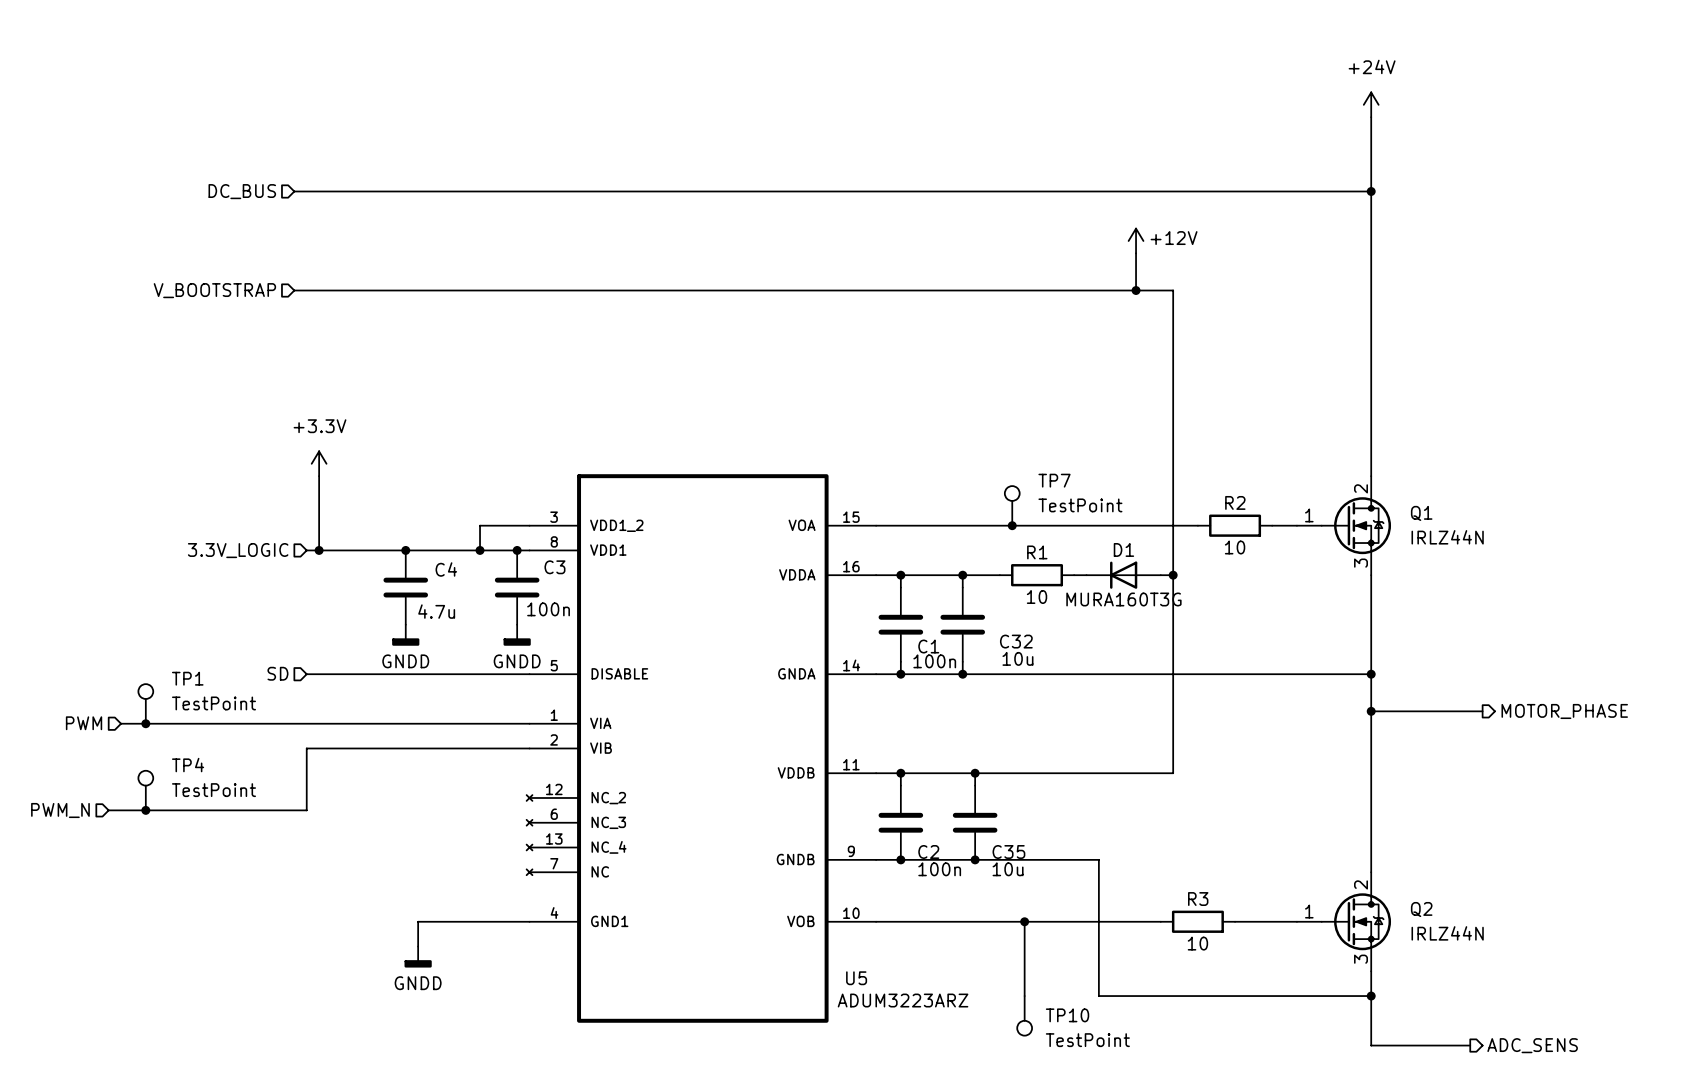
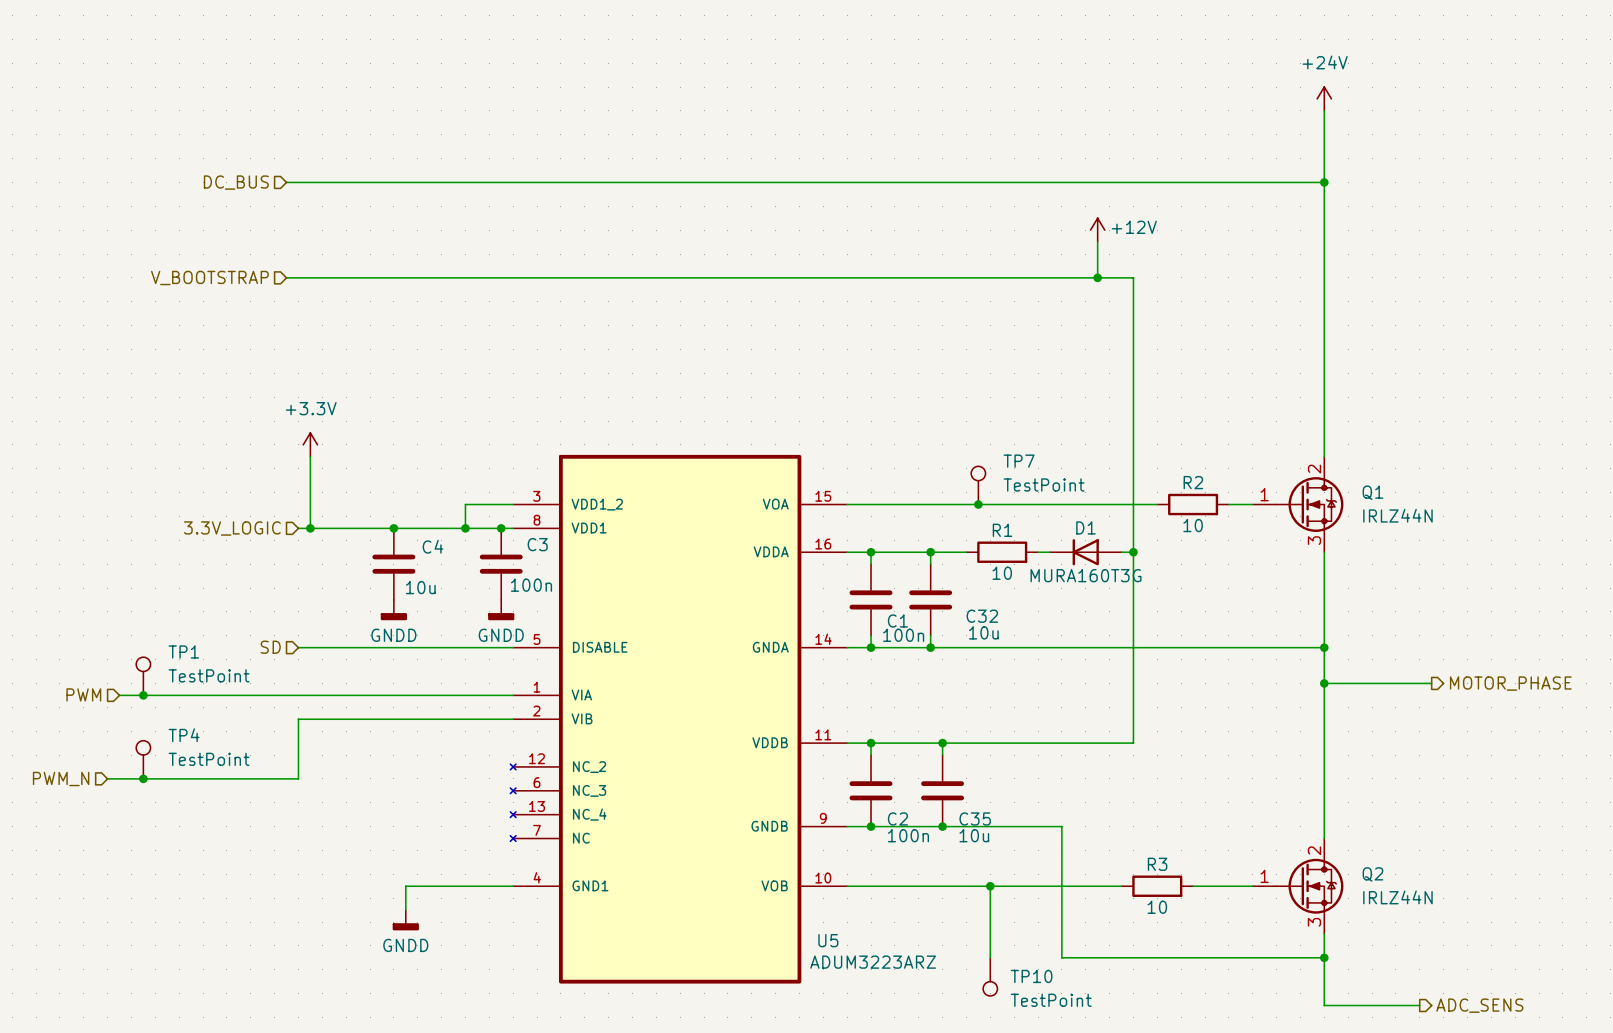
C4 value: 4.7u (436, 611) -> 10u (420, 587)

